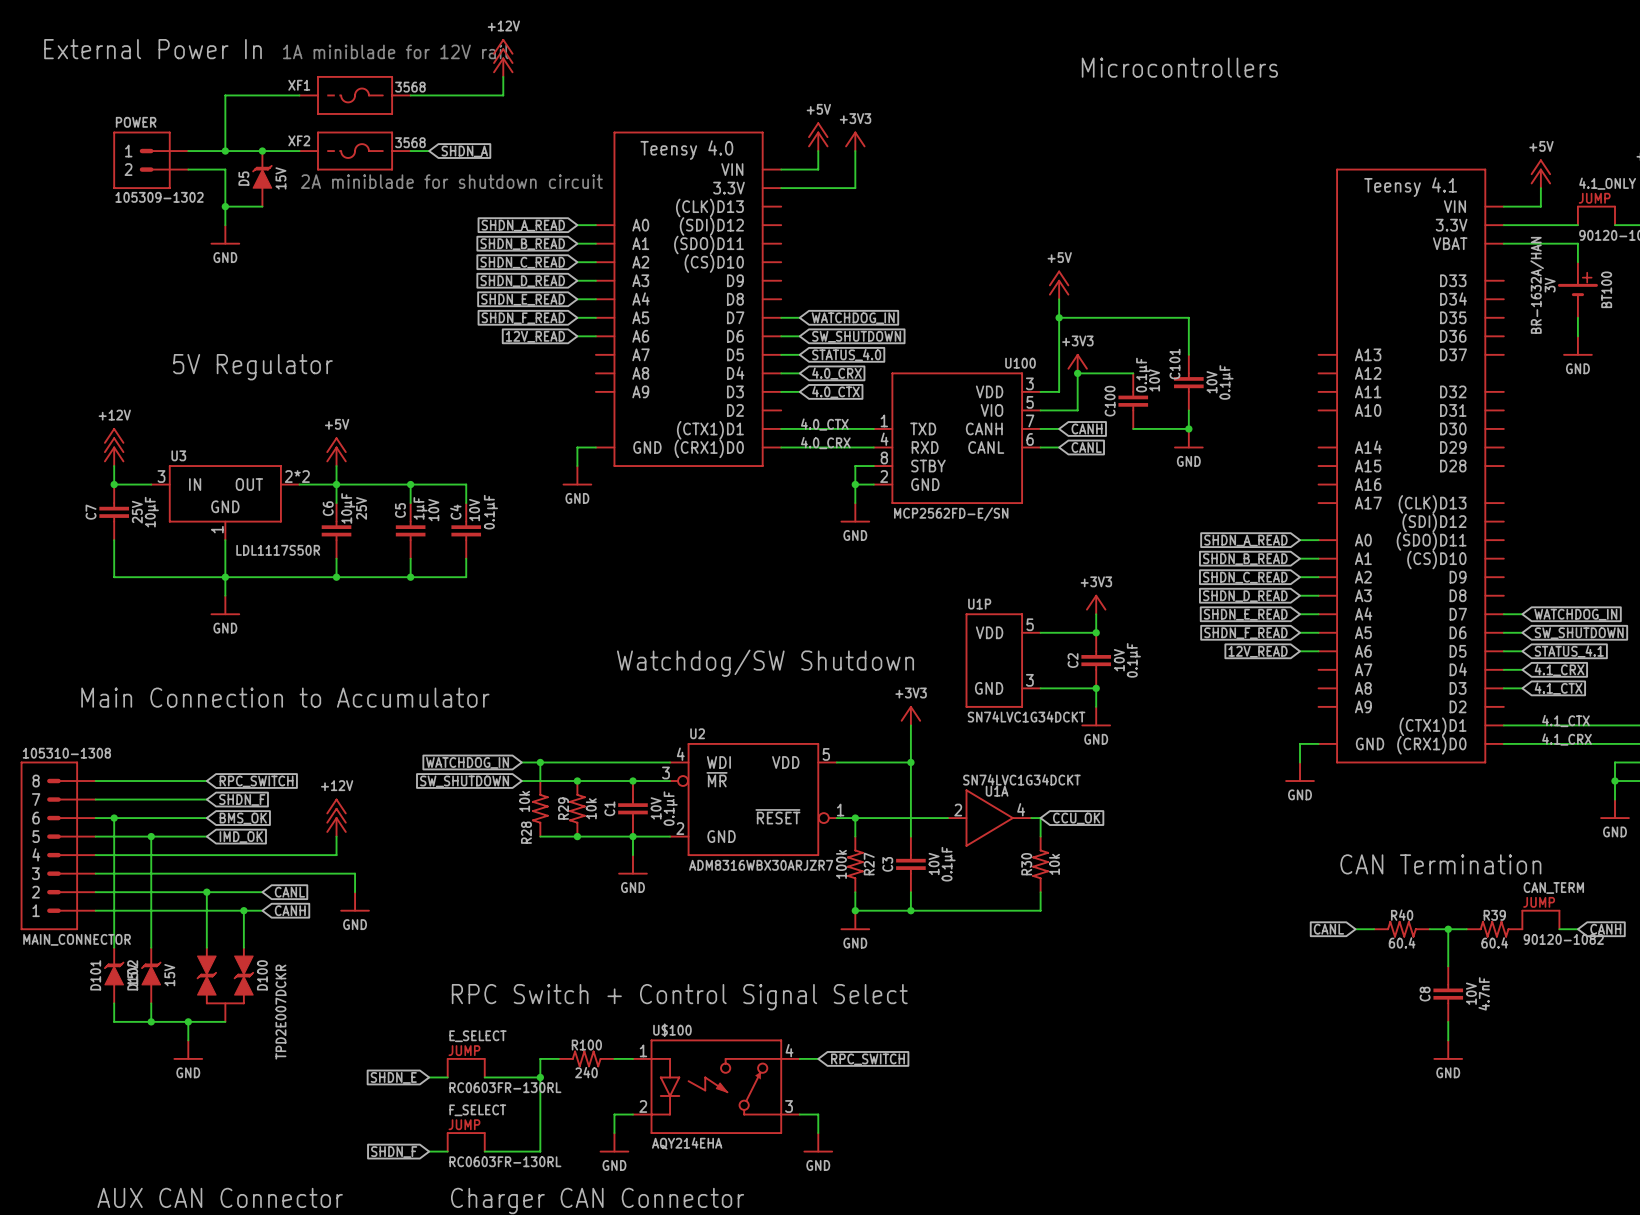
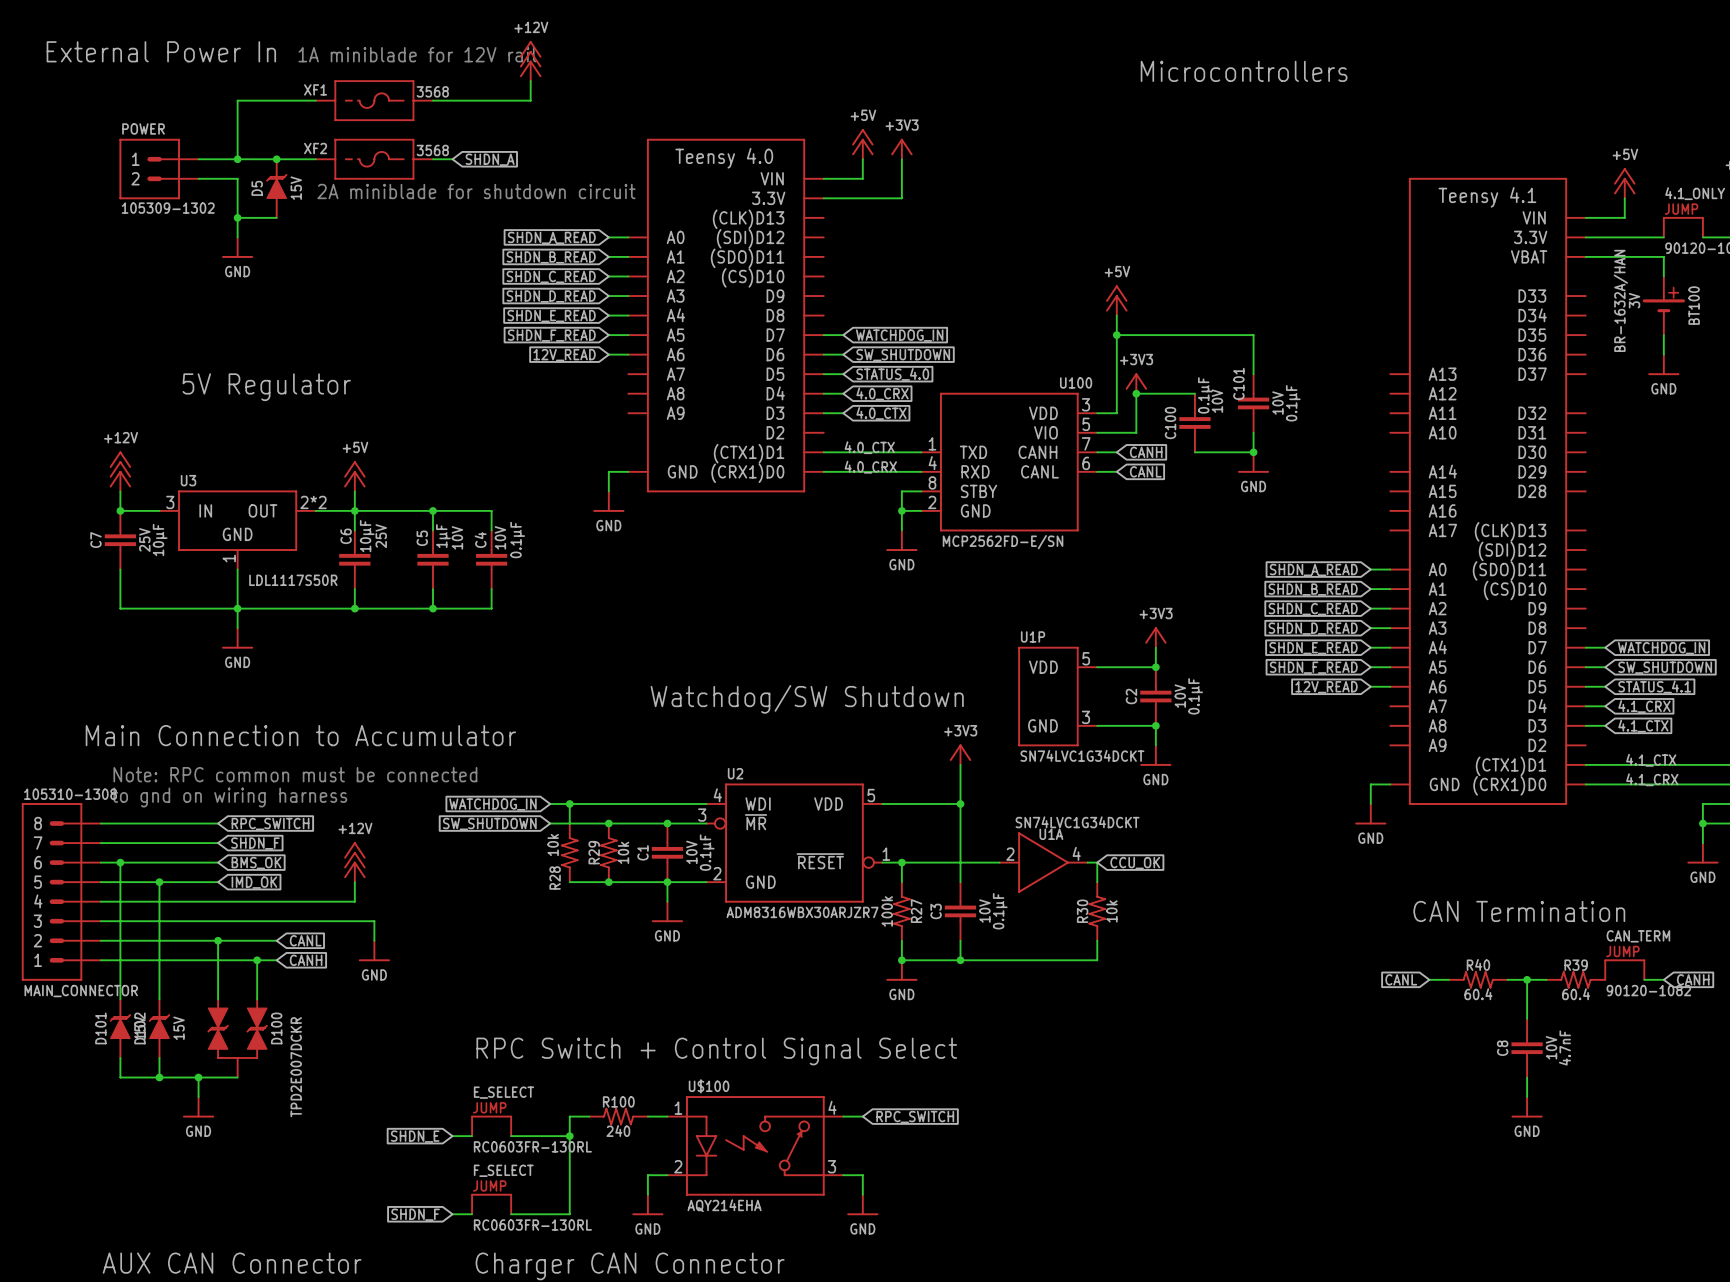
text: none -> Note: RPC common must be connected (295, 774)
text: none -> to gnd on wiring harness (229, 797)

